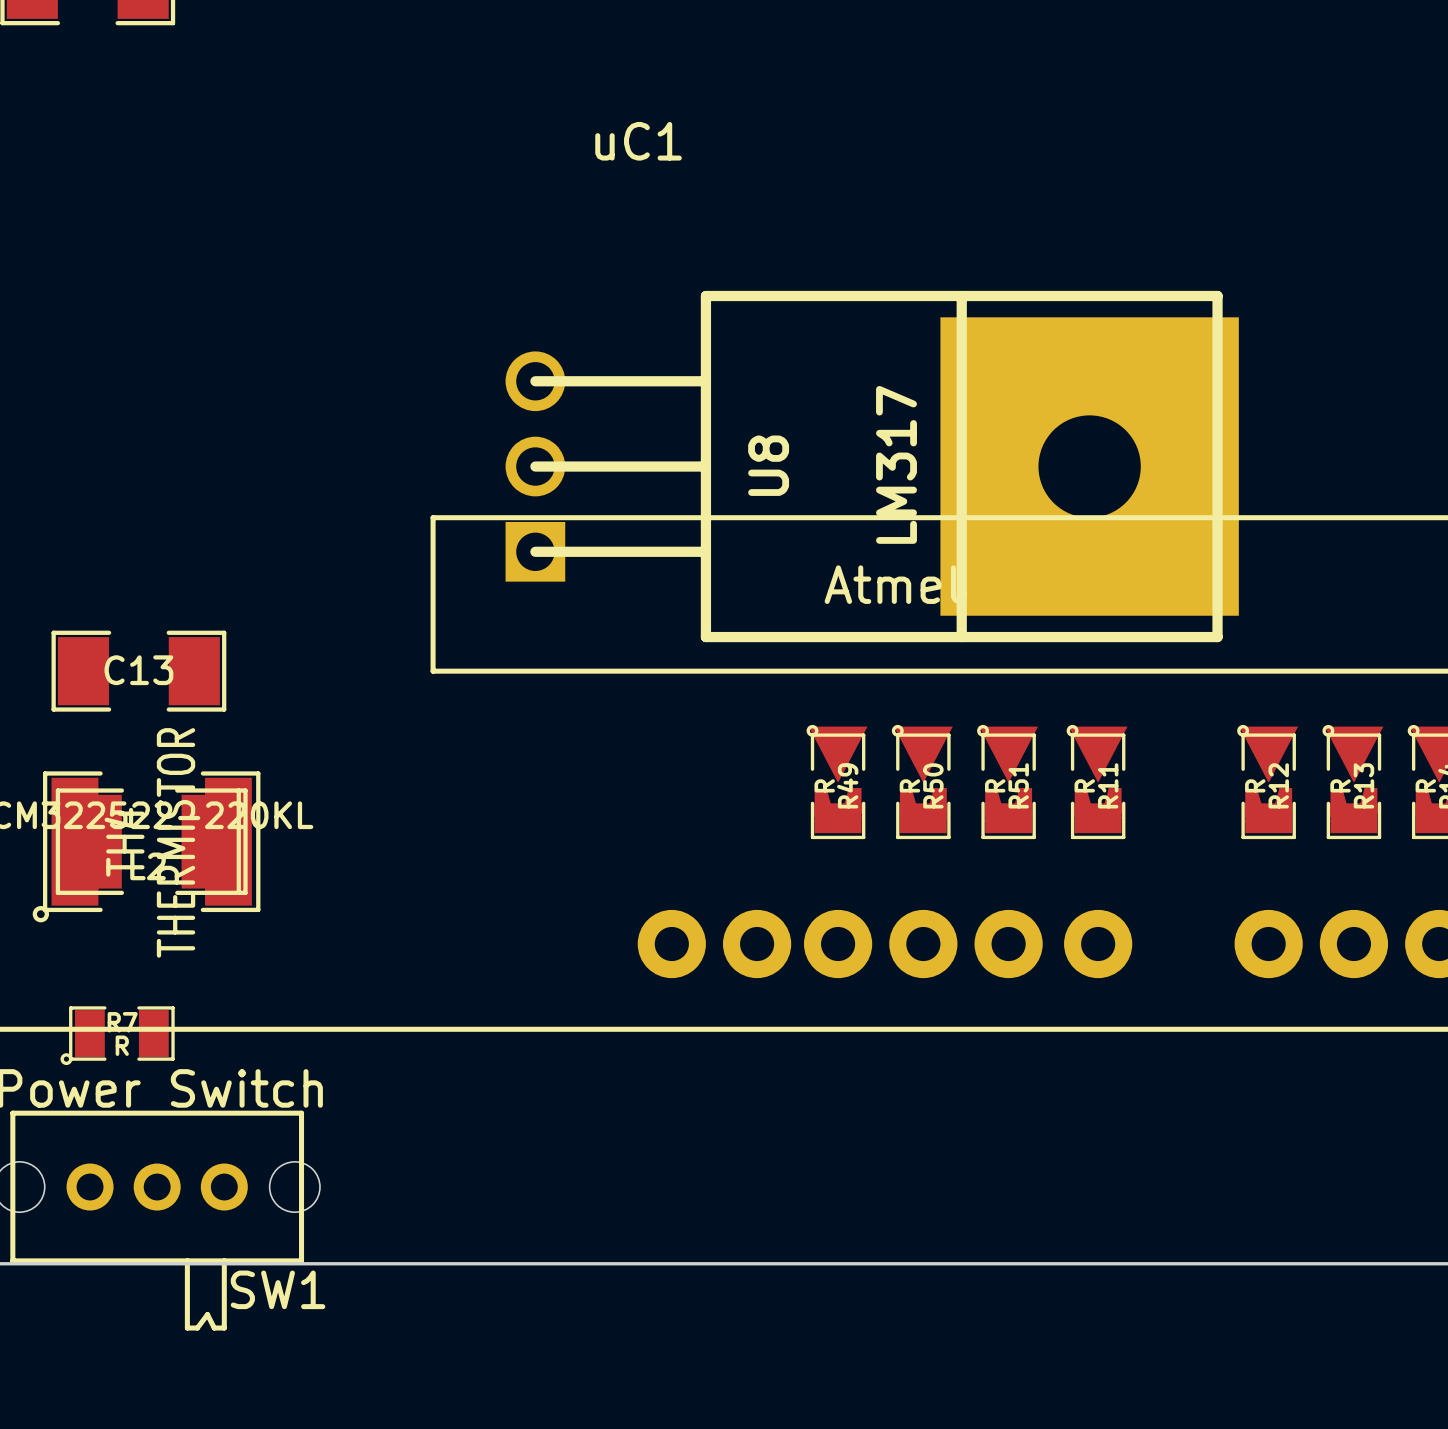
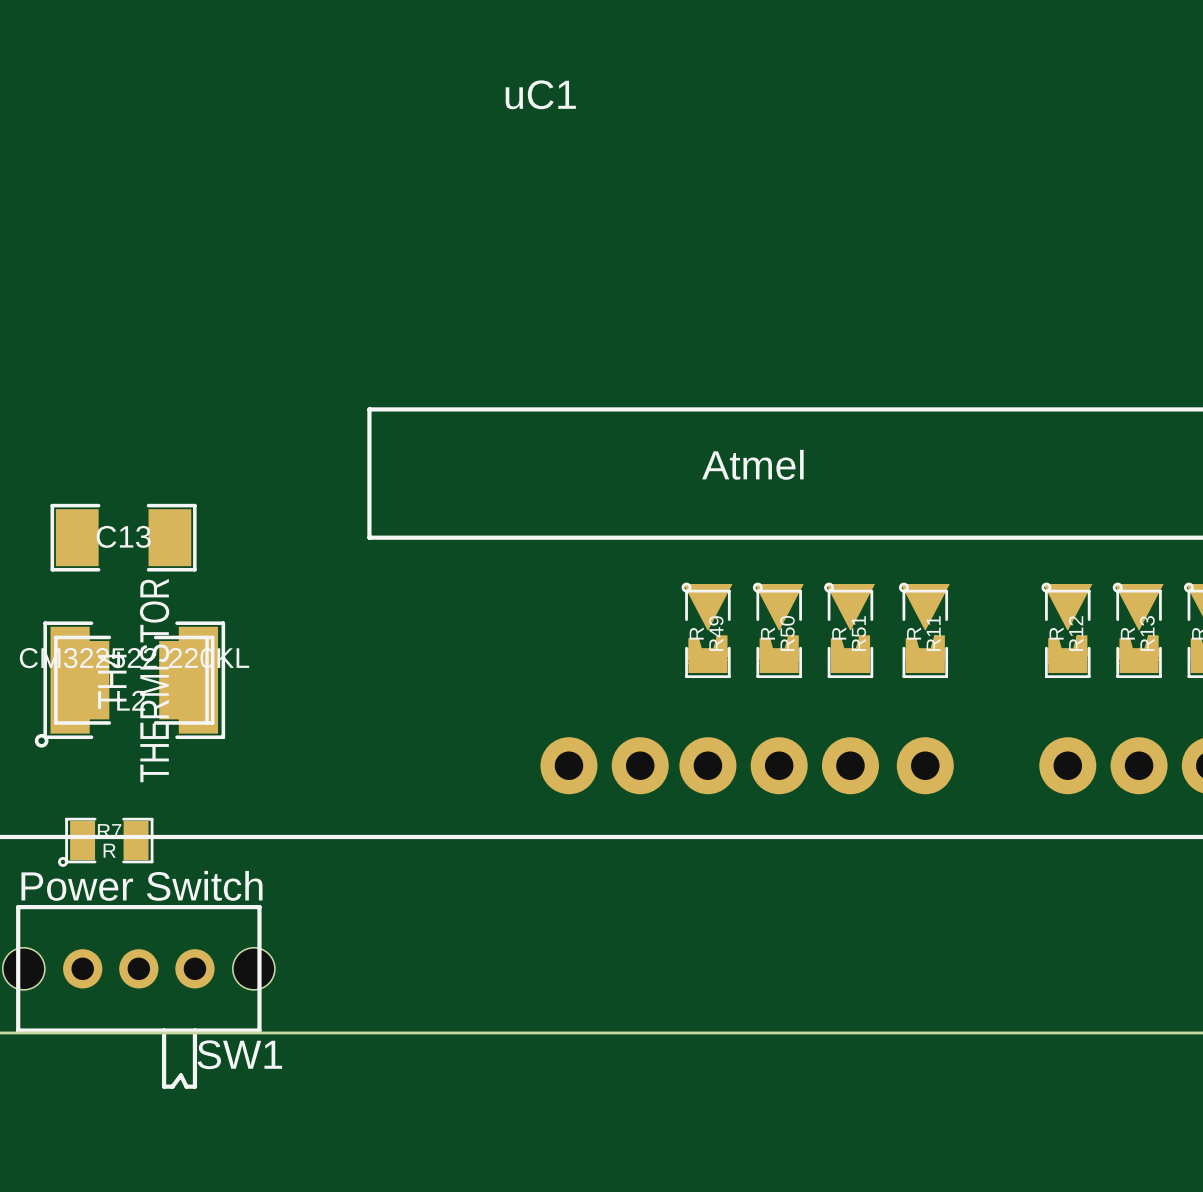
U8: LM317 (872, 466) -> none

